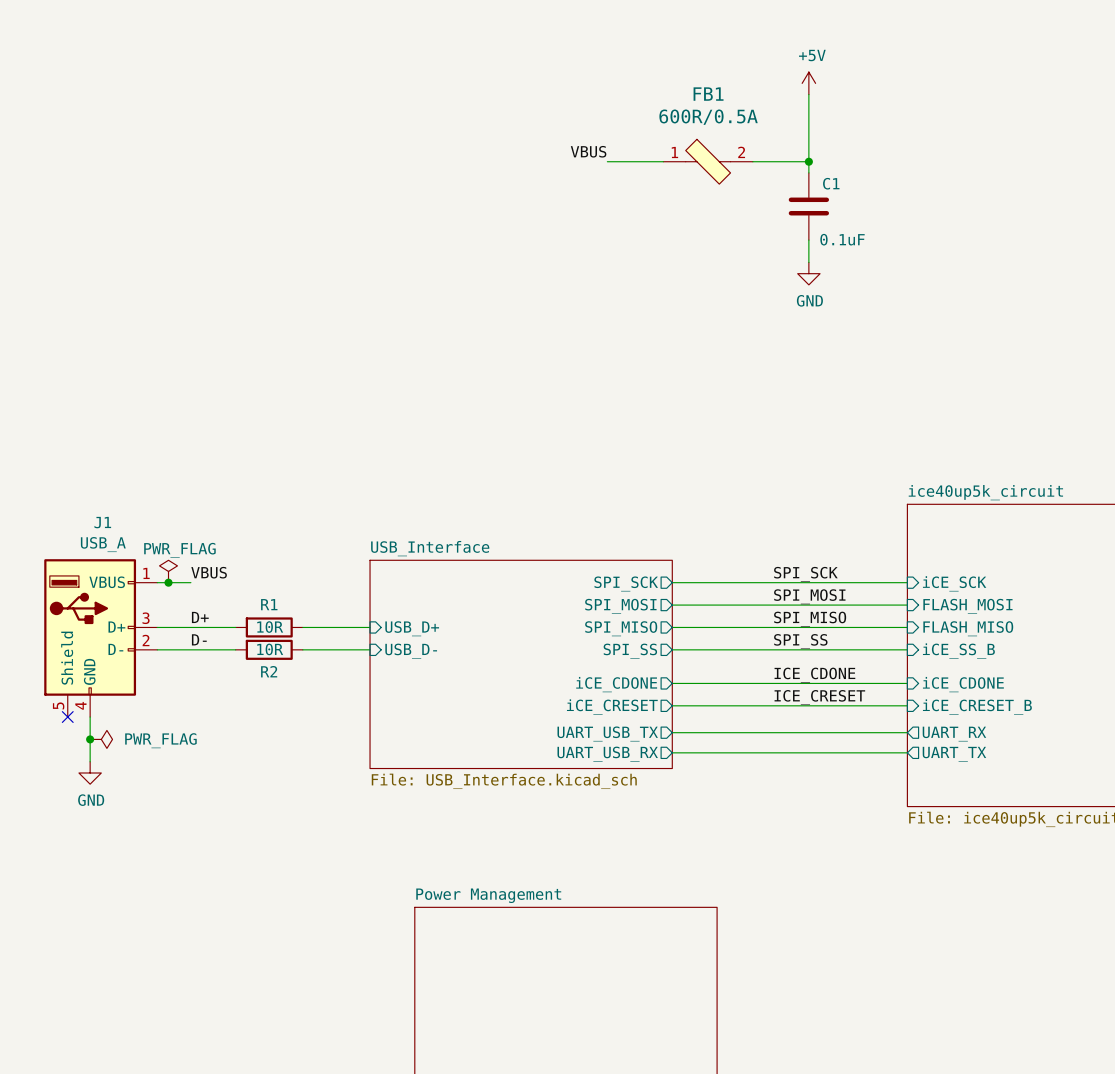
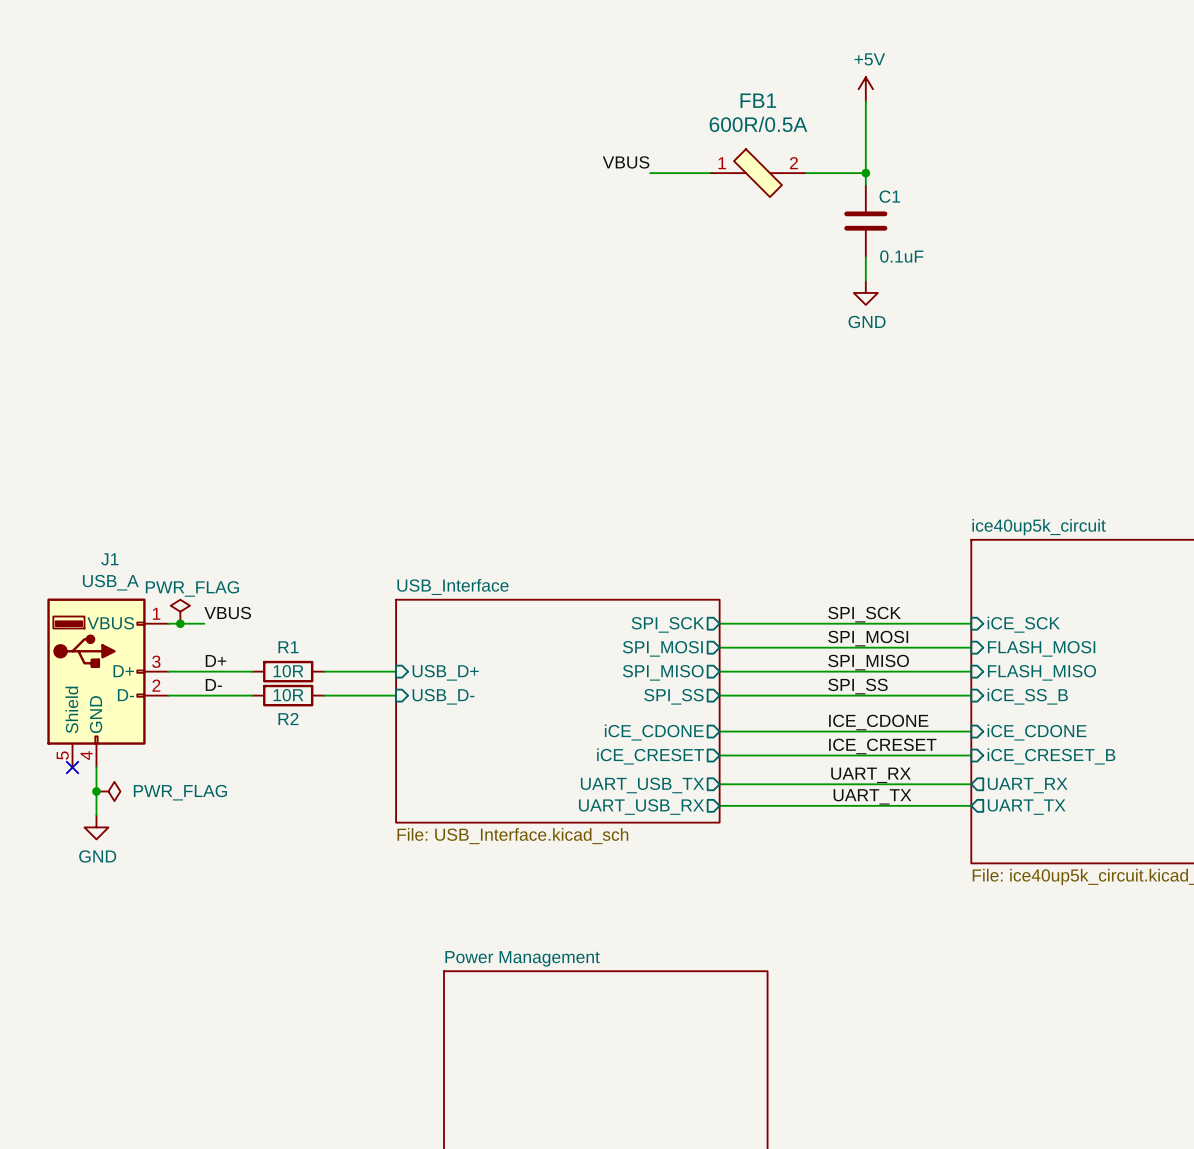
label: none -> UART_RX (871, 775)
label: none -> UART_TX (872, 796)

